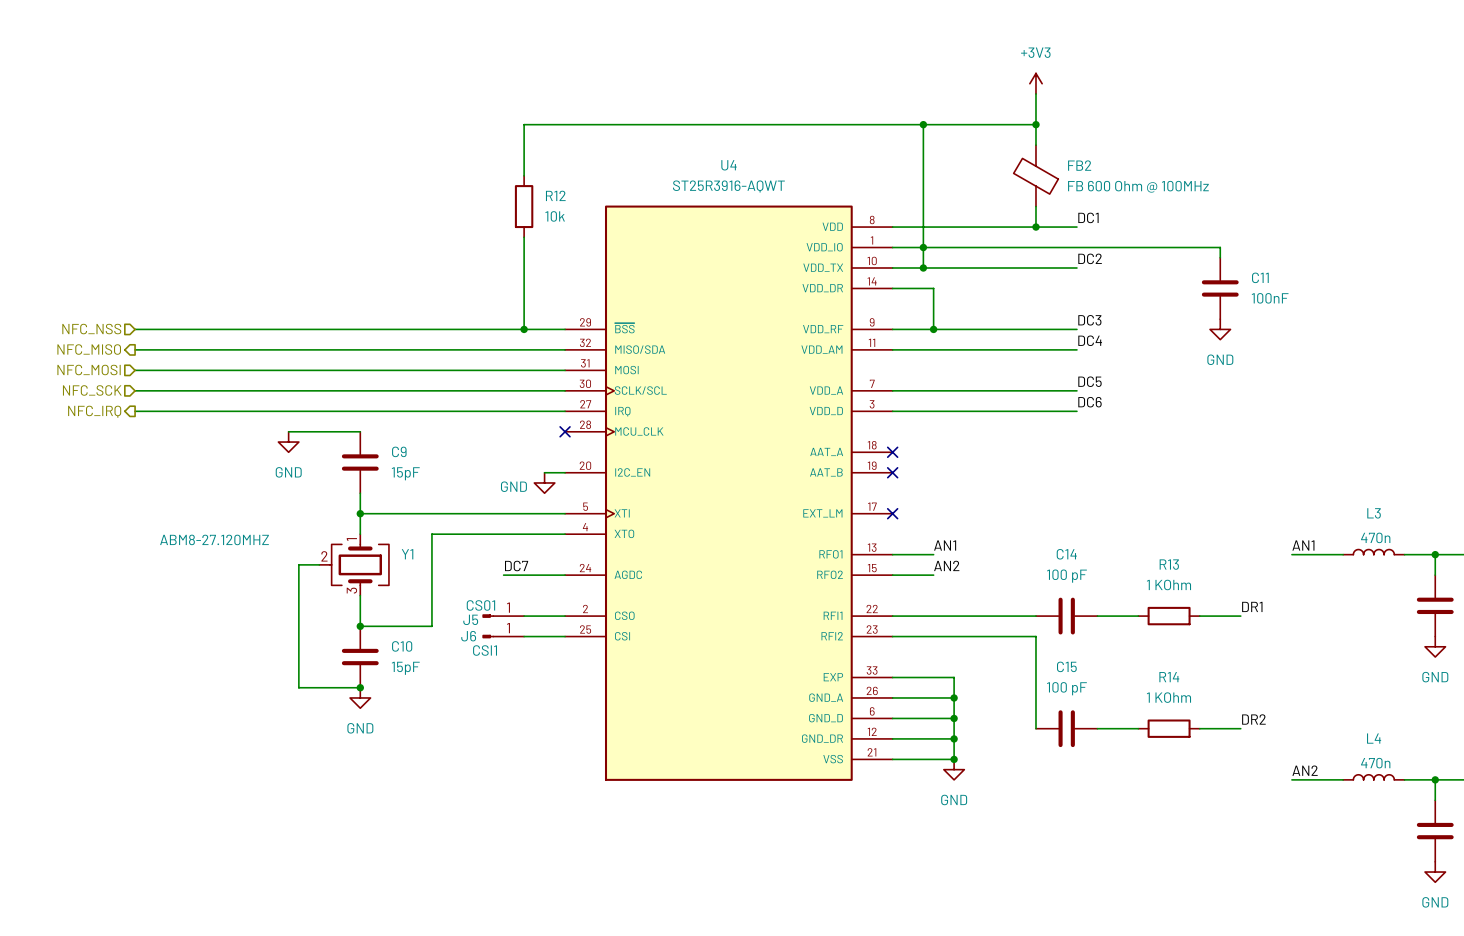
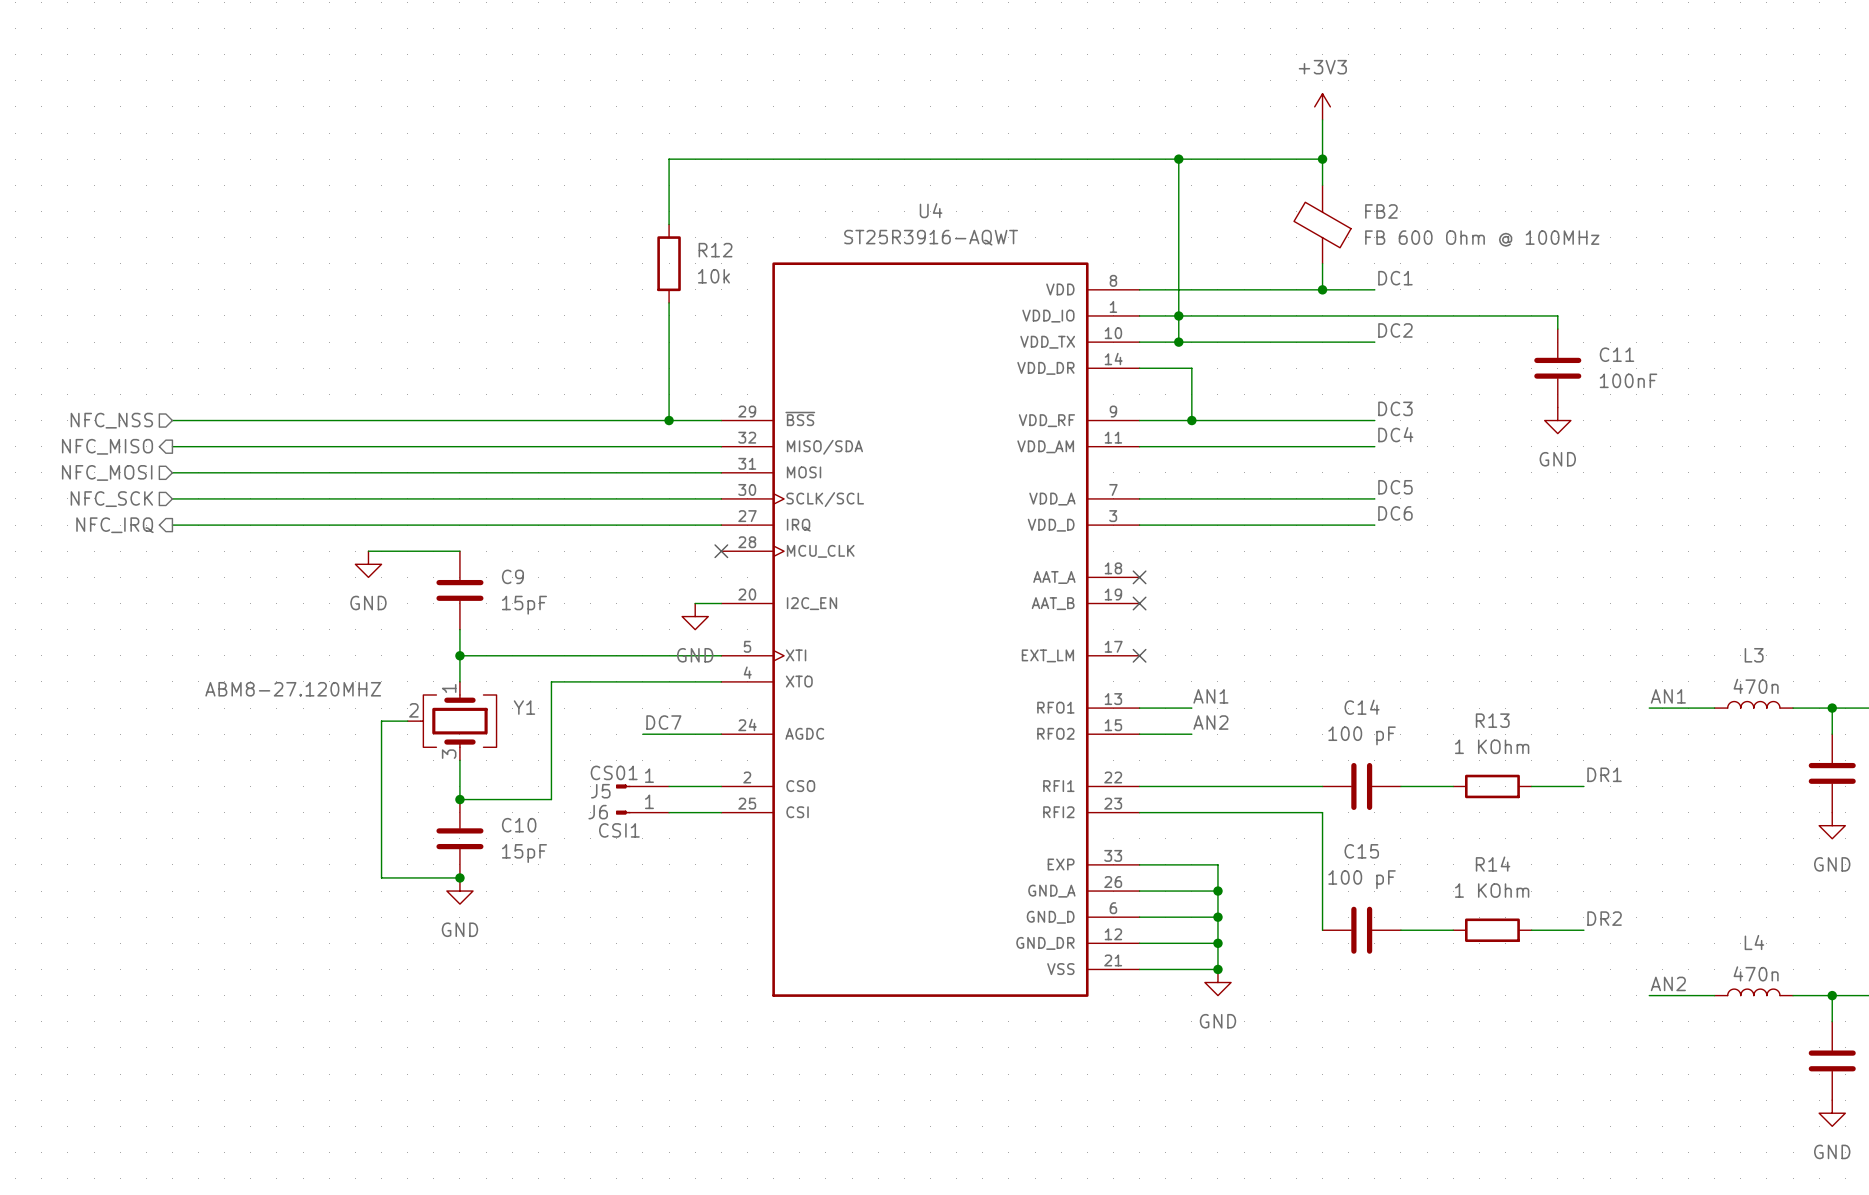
power symbol text position: GND (513, 486) -> GND (695, 655)

